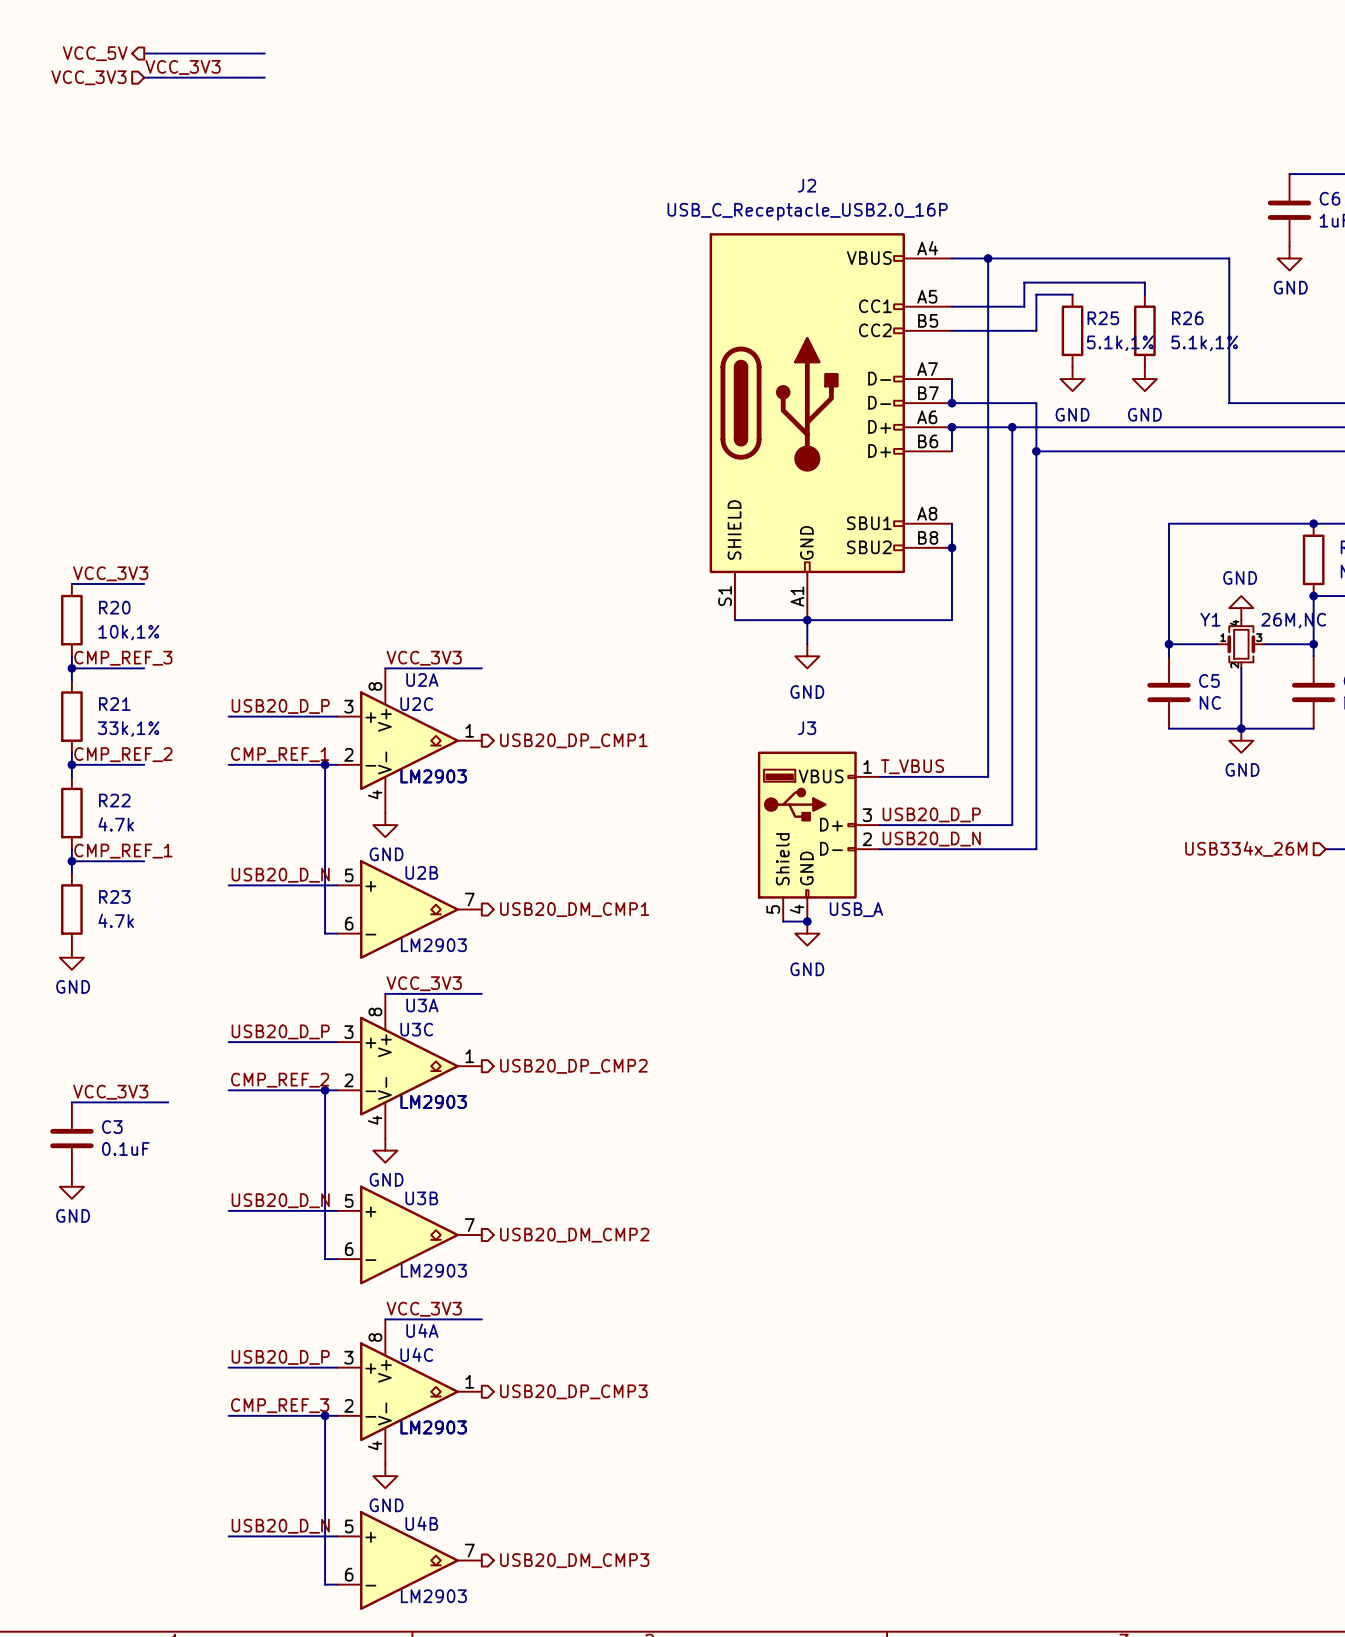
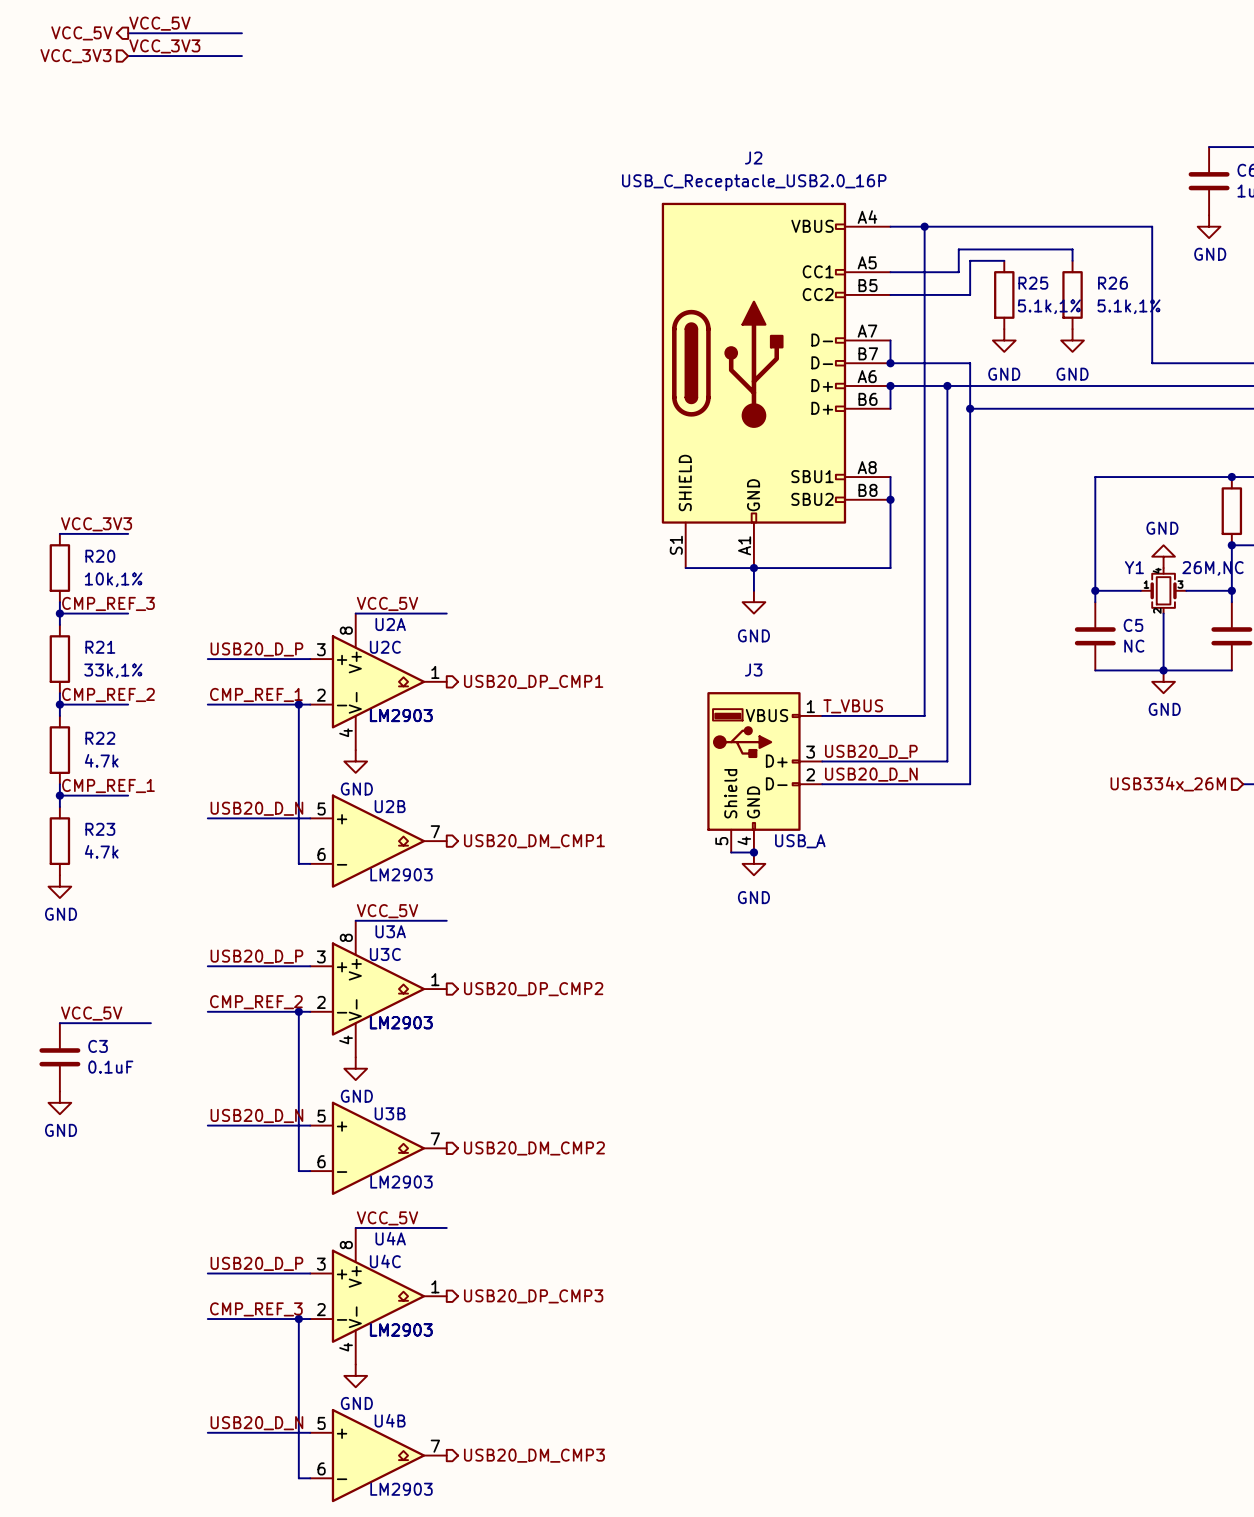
label: none -> VCC_5V (159, 23)
label: VCC_3V3 (424, 658) -> VCC_5V (387, 603)
label: VCC_3V3 (424, 983) -> VCC_5V (387, 911)
label: VCC_3V3 (110, 1092) -> VCC_5V (91, 1013)
label: VCC_3V3 (424, 1309) -> VCC_5V (387, 1218)

